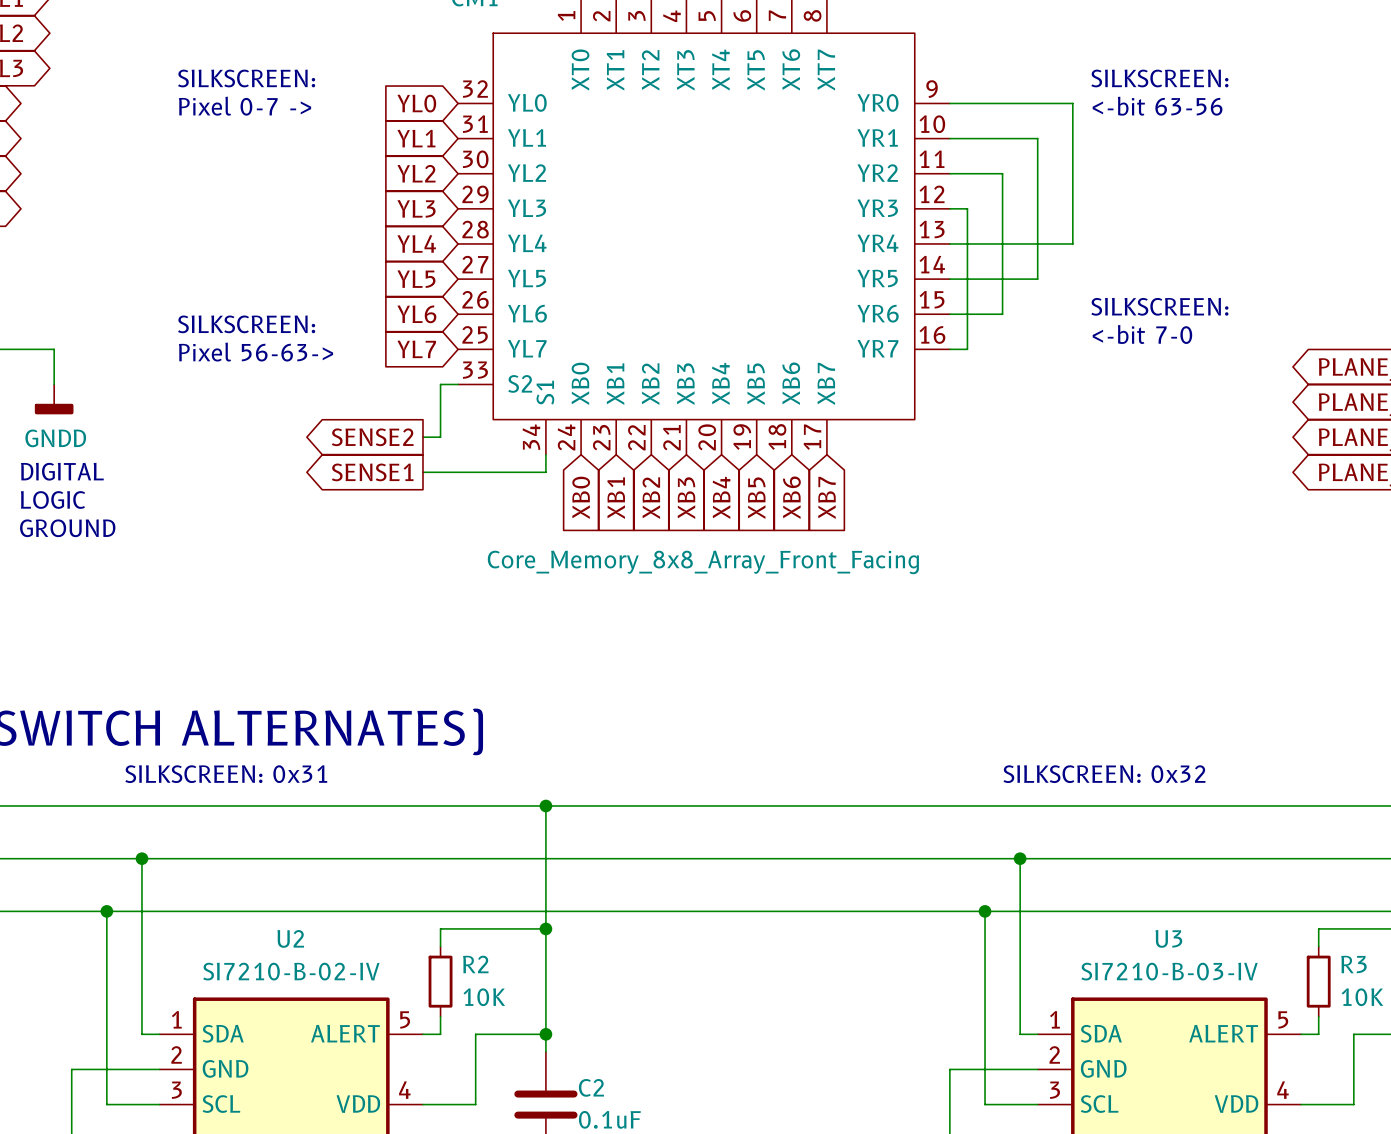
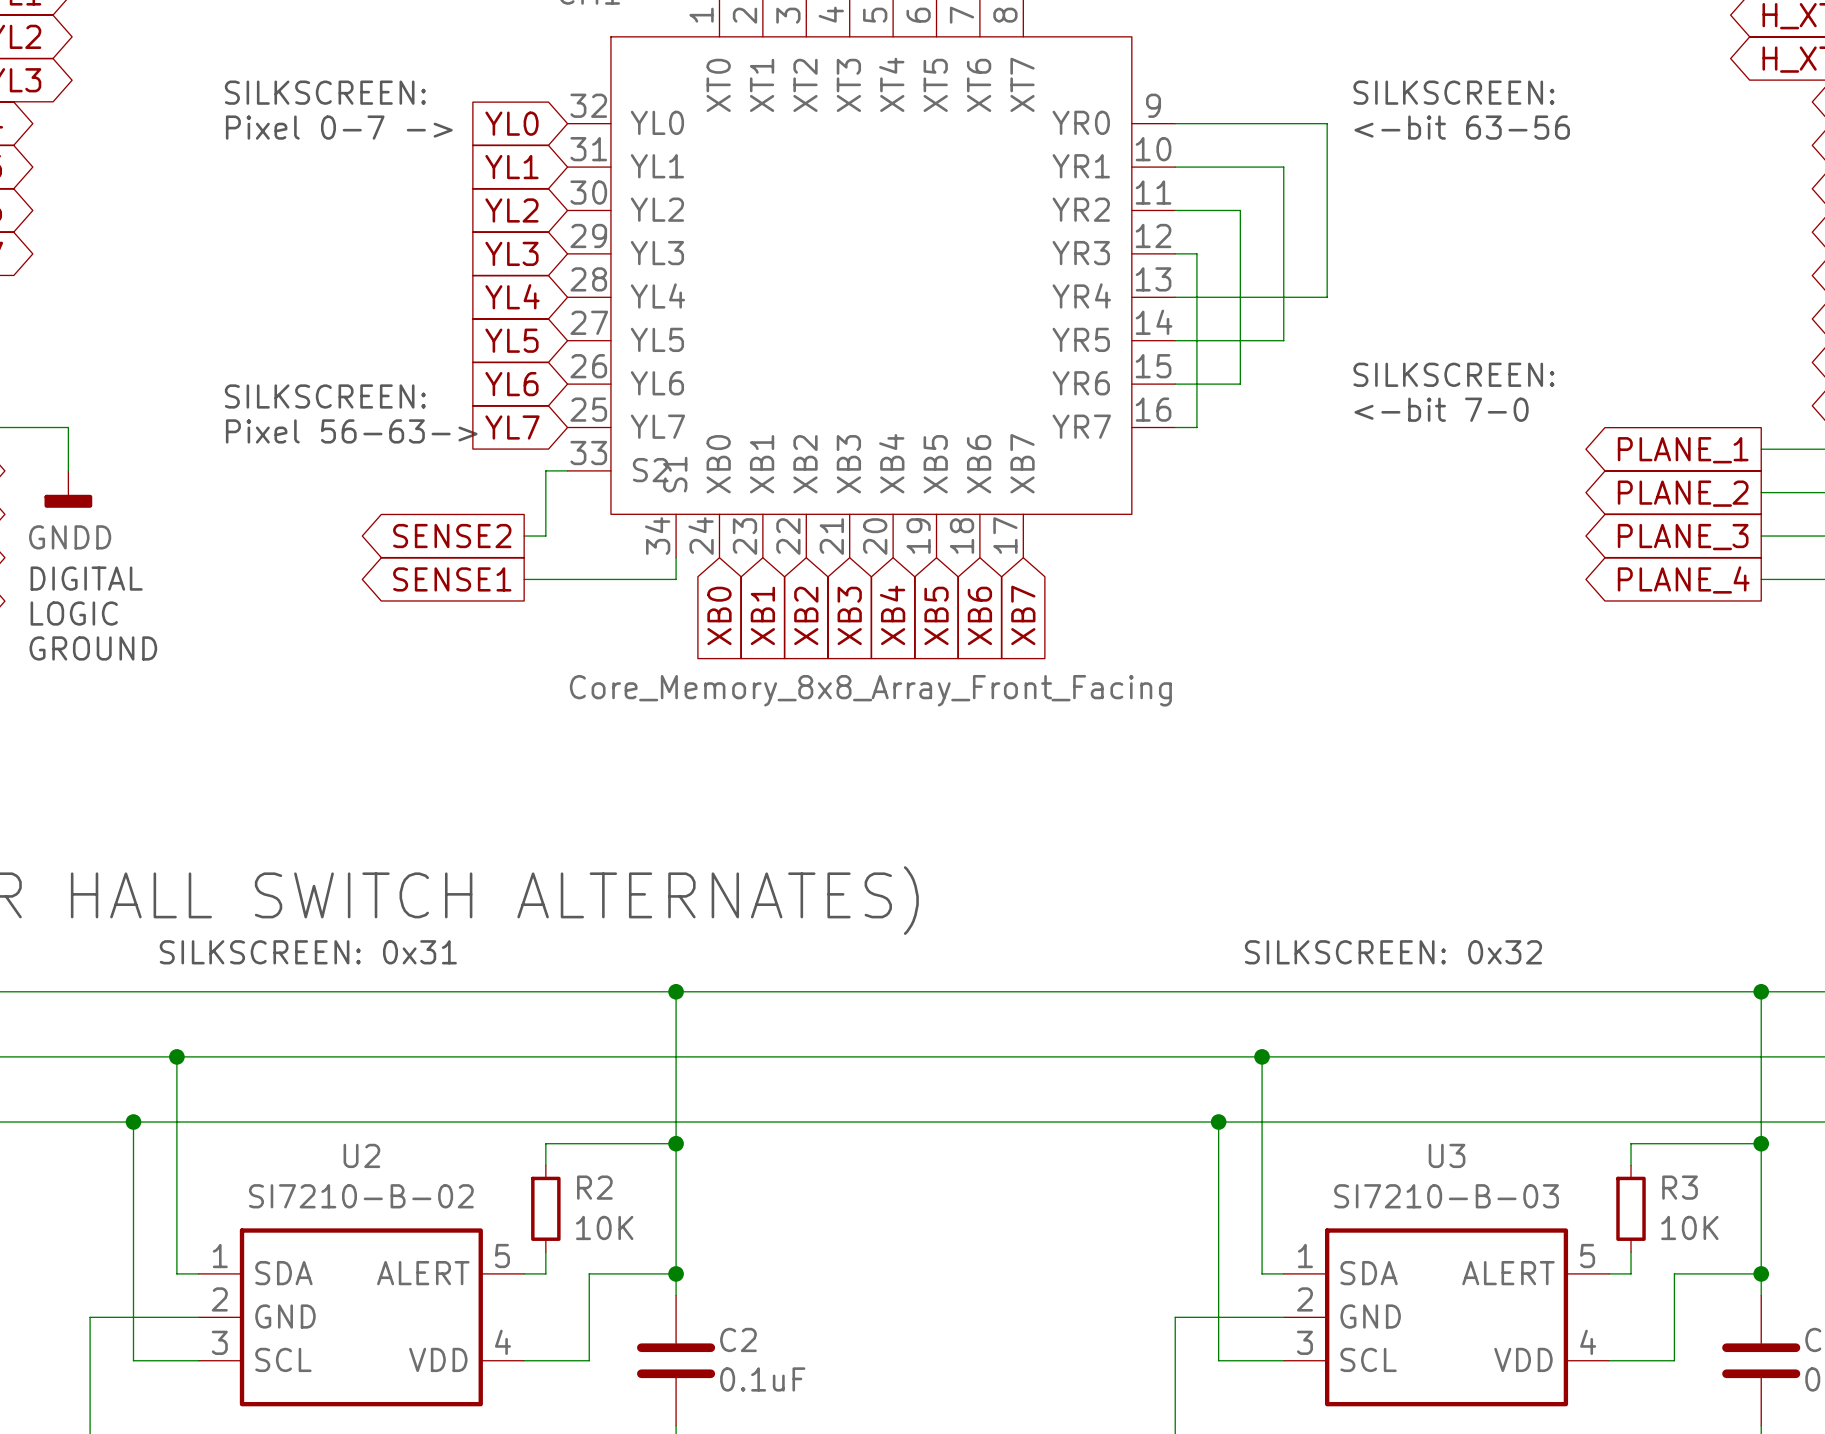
U2 value: SI7210-B-02-IV (291, 971) -> SI7210-B-02 (361, 1196)
U3 value: SI7210-B-03-IV (1169, 971) -> SI7210-B-03 (1446, 1196)

